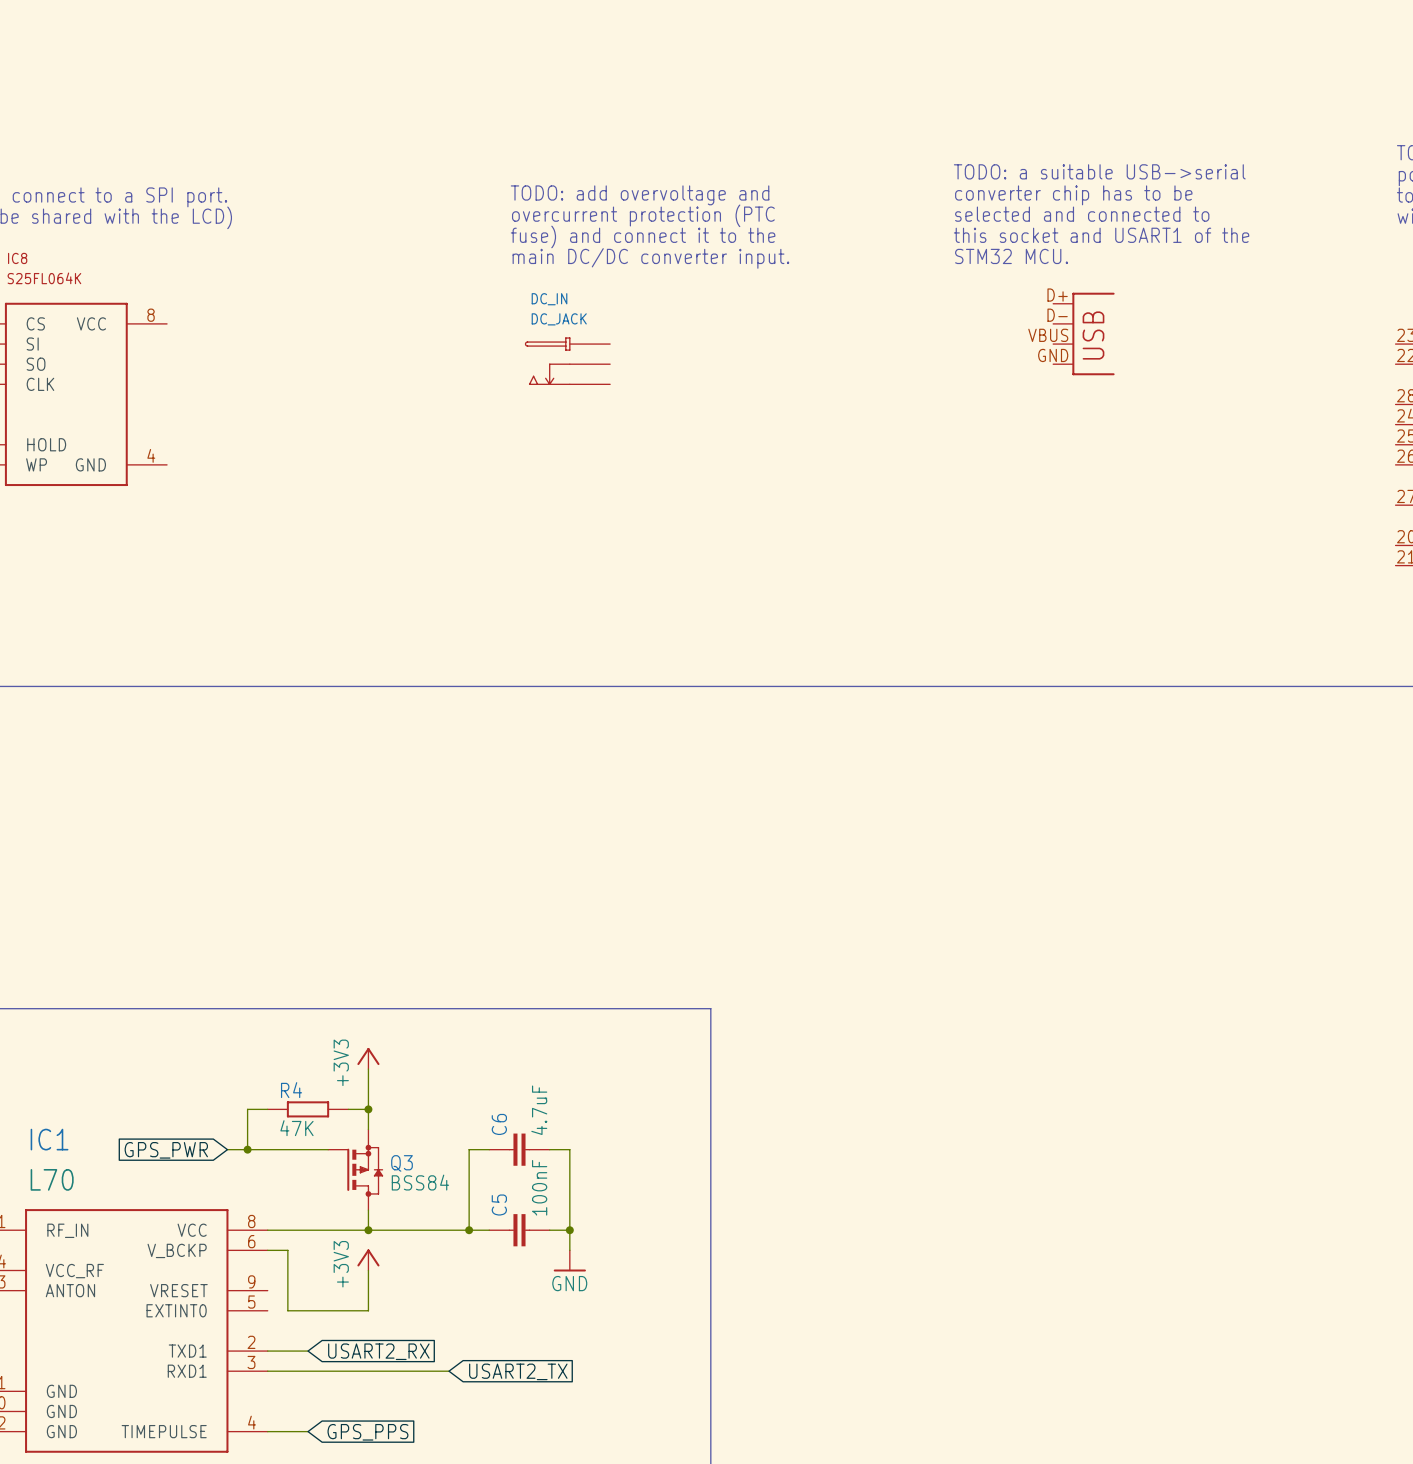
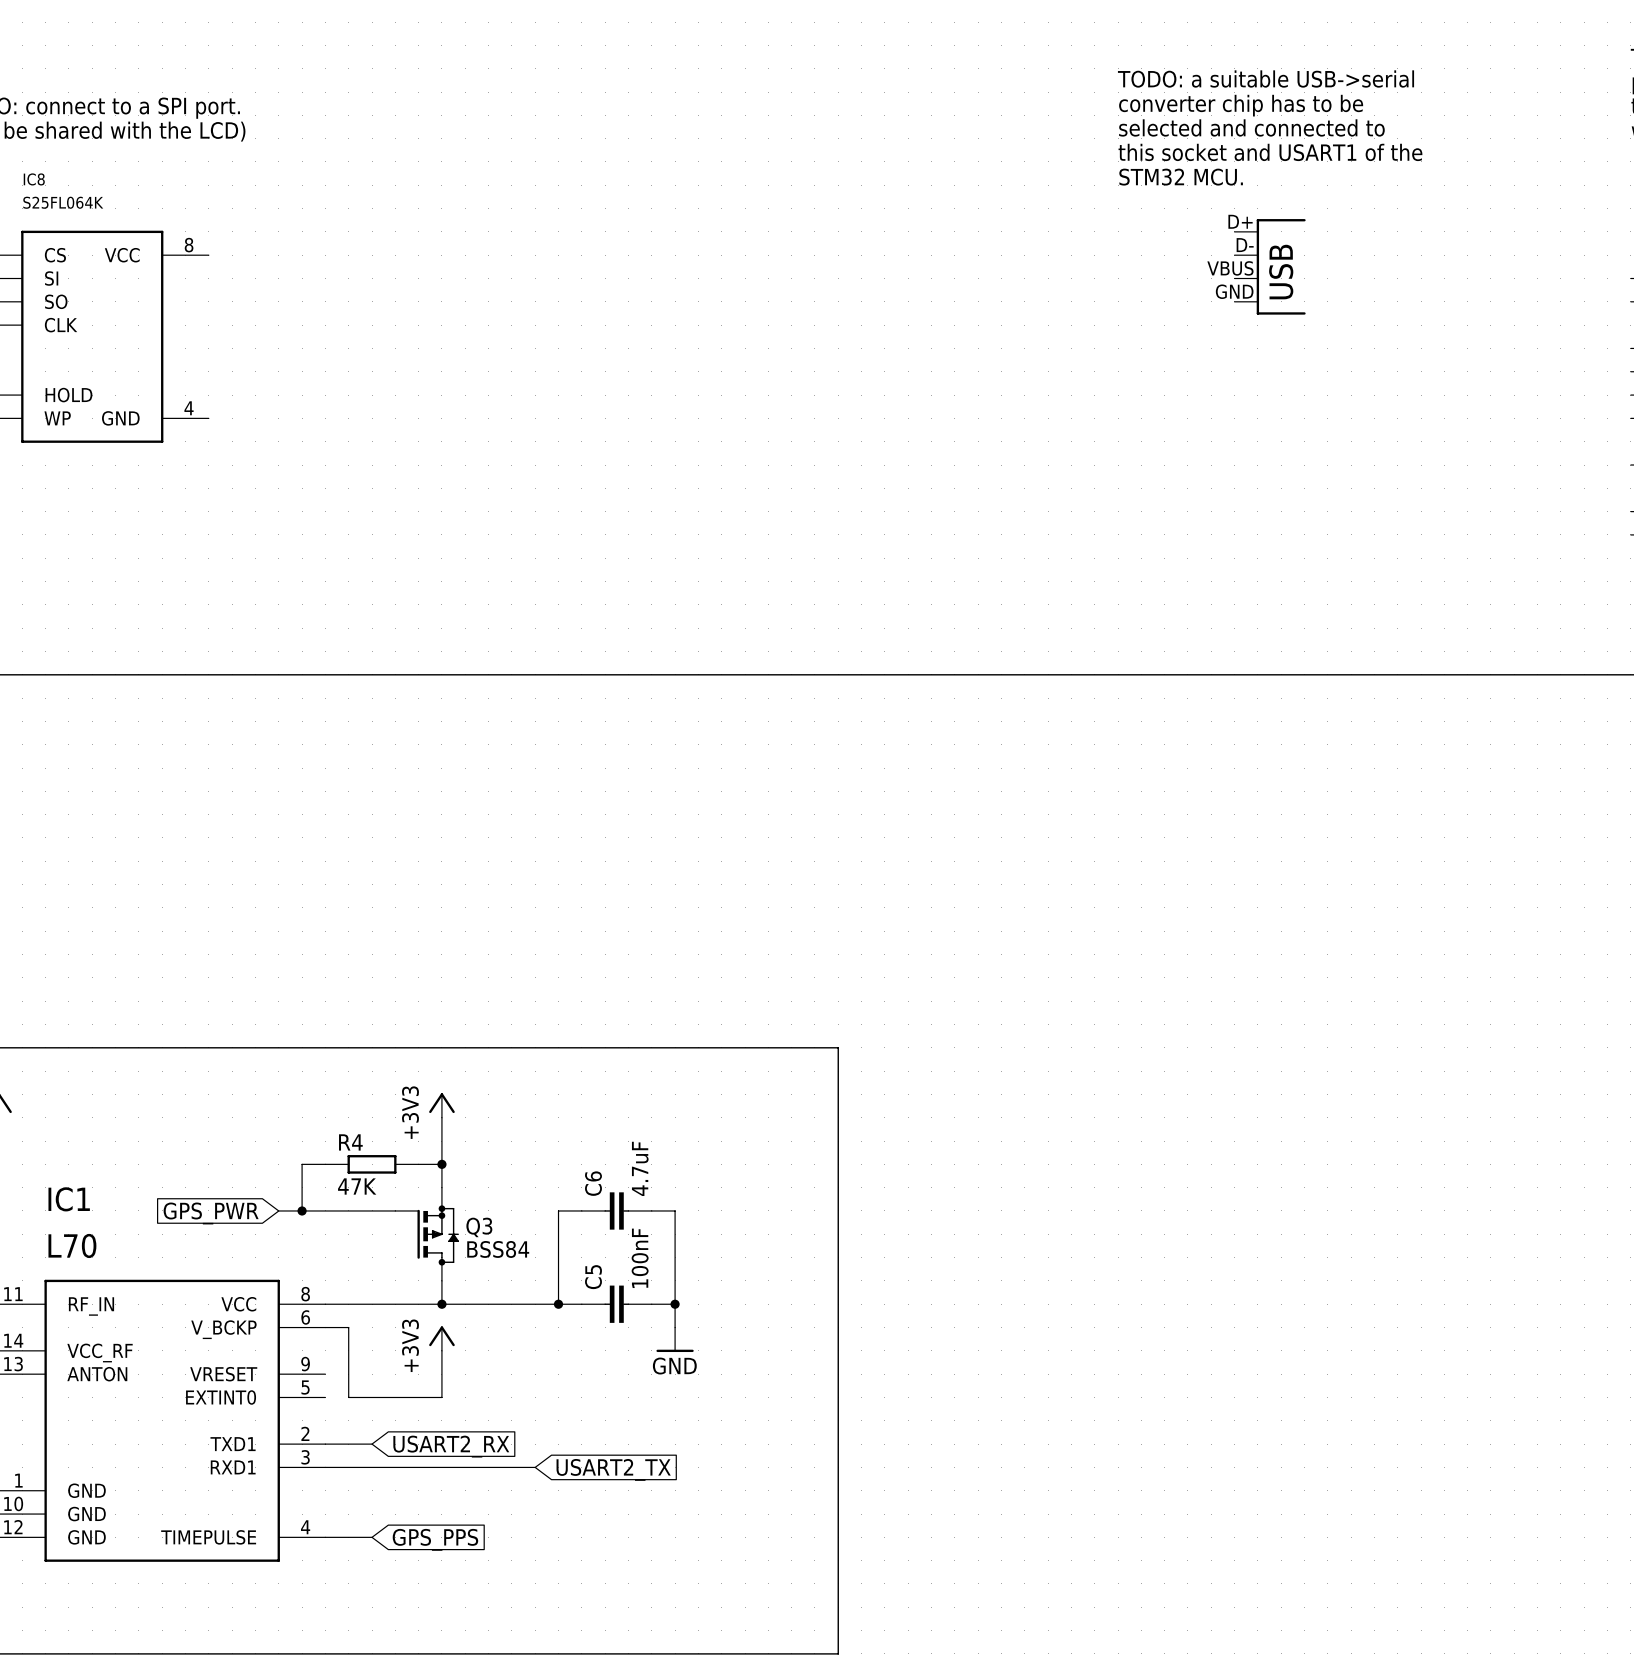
text: TODO: add overvoltage and (640, 195) -> none
text: overcurrent protection (PTC (643, 215) -> none
text: fuse) and connect it to the (643, 236) -> none
text: main DC/DC converter input. (650, 258) -> none
DC_IN: DC_JACK (567, 361) -> none

